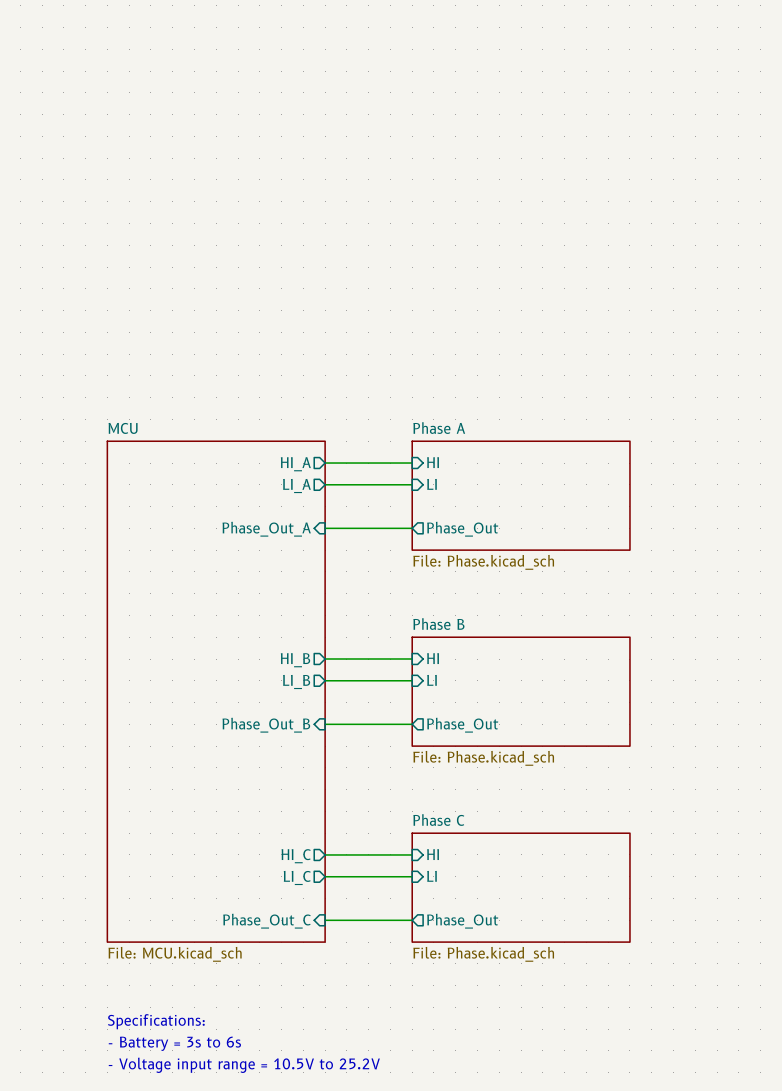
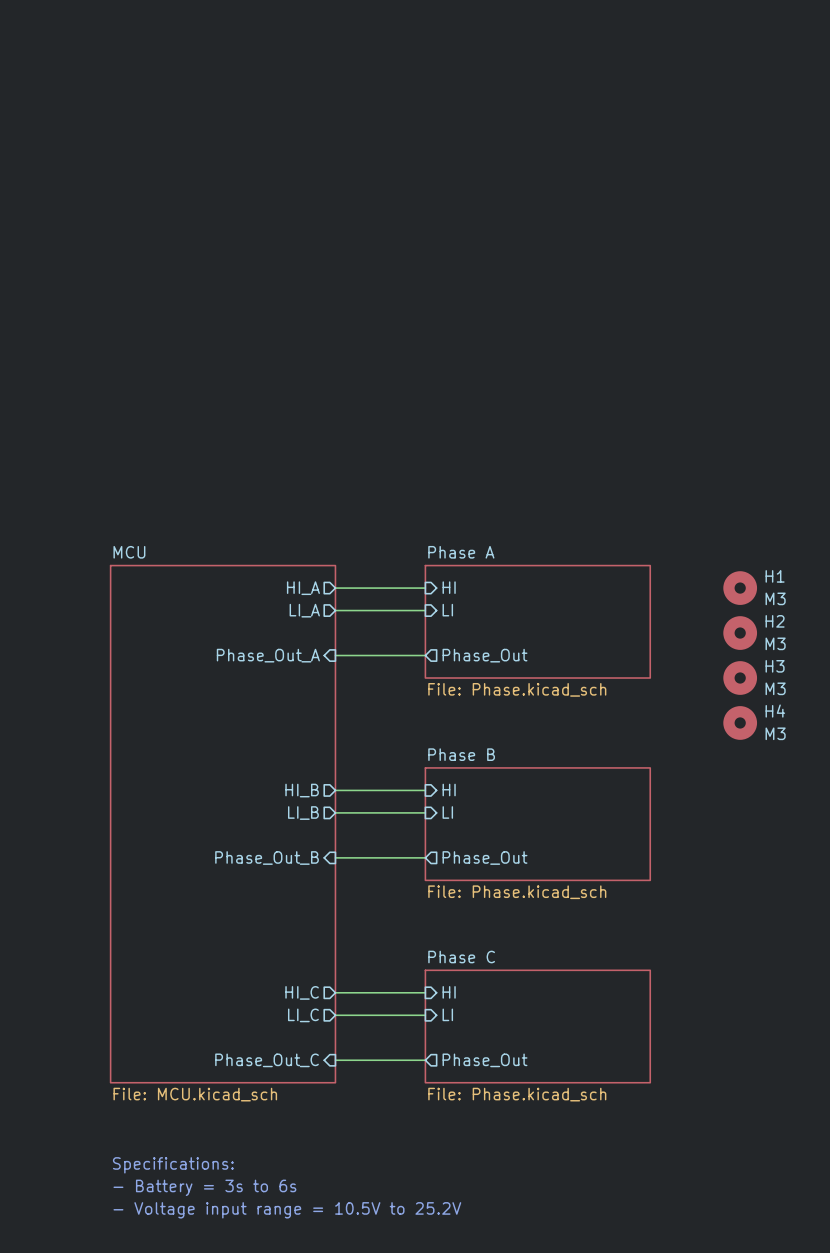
H1: none -> M3 (740, 588)
H2: none -> M3 (740, 633)
H3: none -> M3 (740, 678)
H4: none -> M3 (740, 722)

